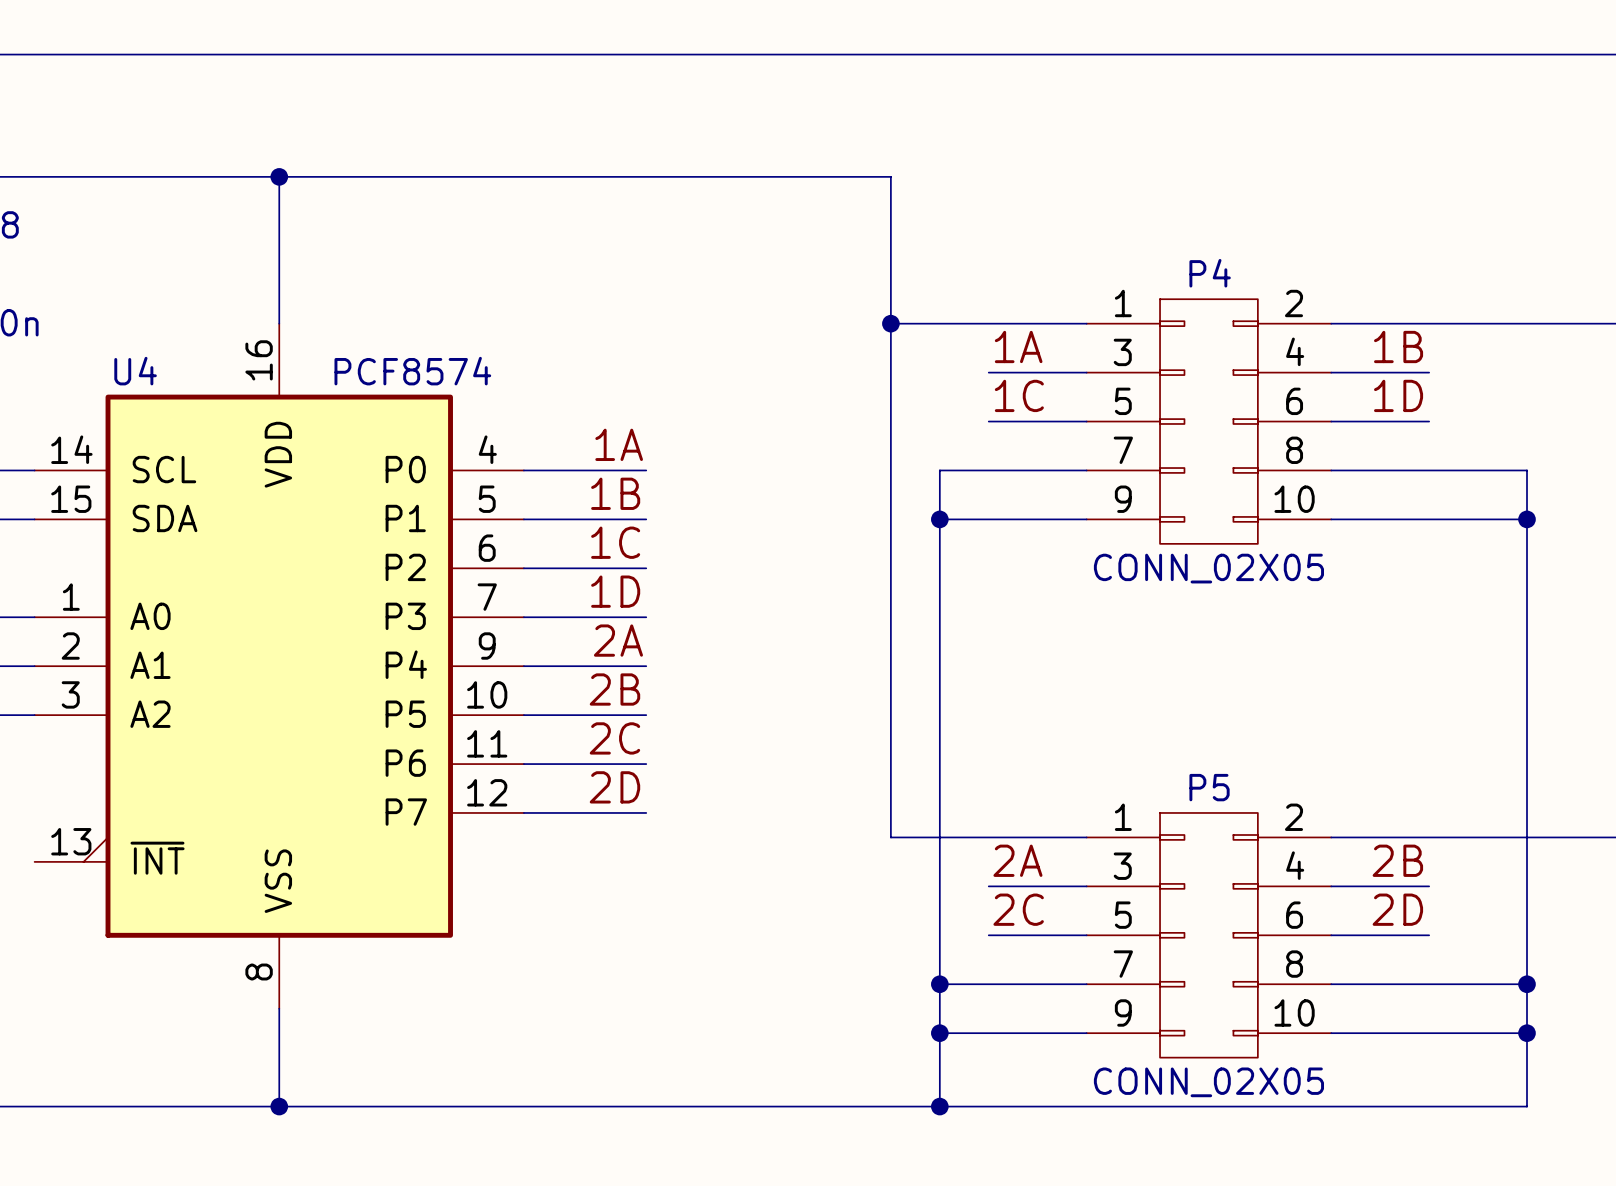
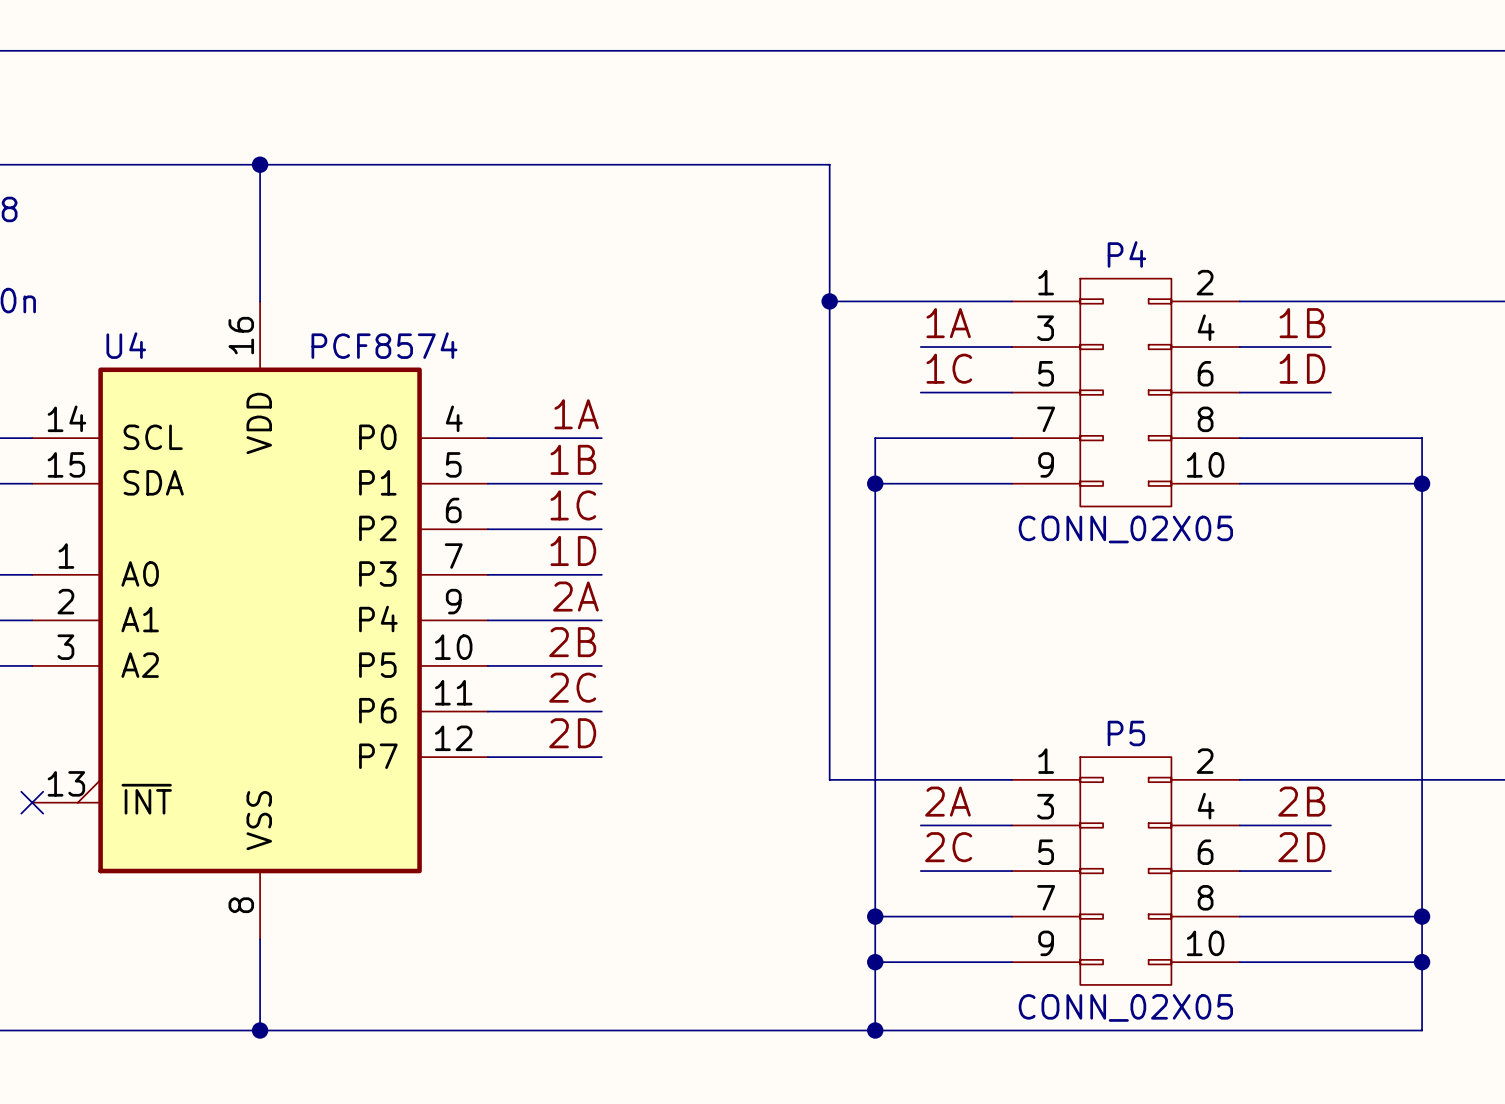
no-connect mark: none -> (32, 802)

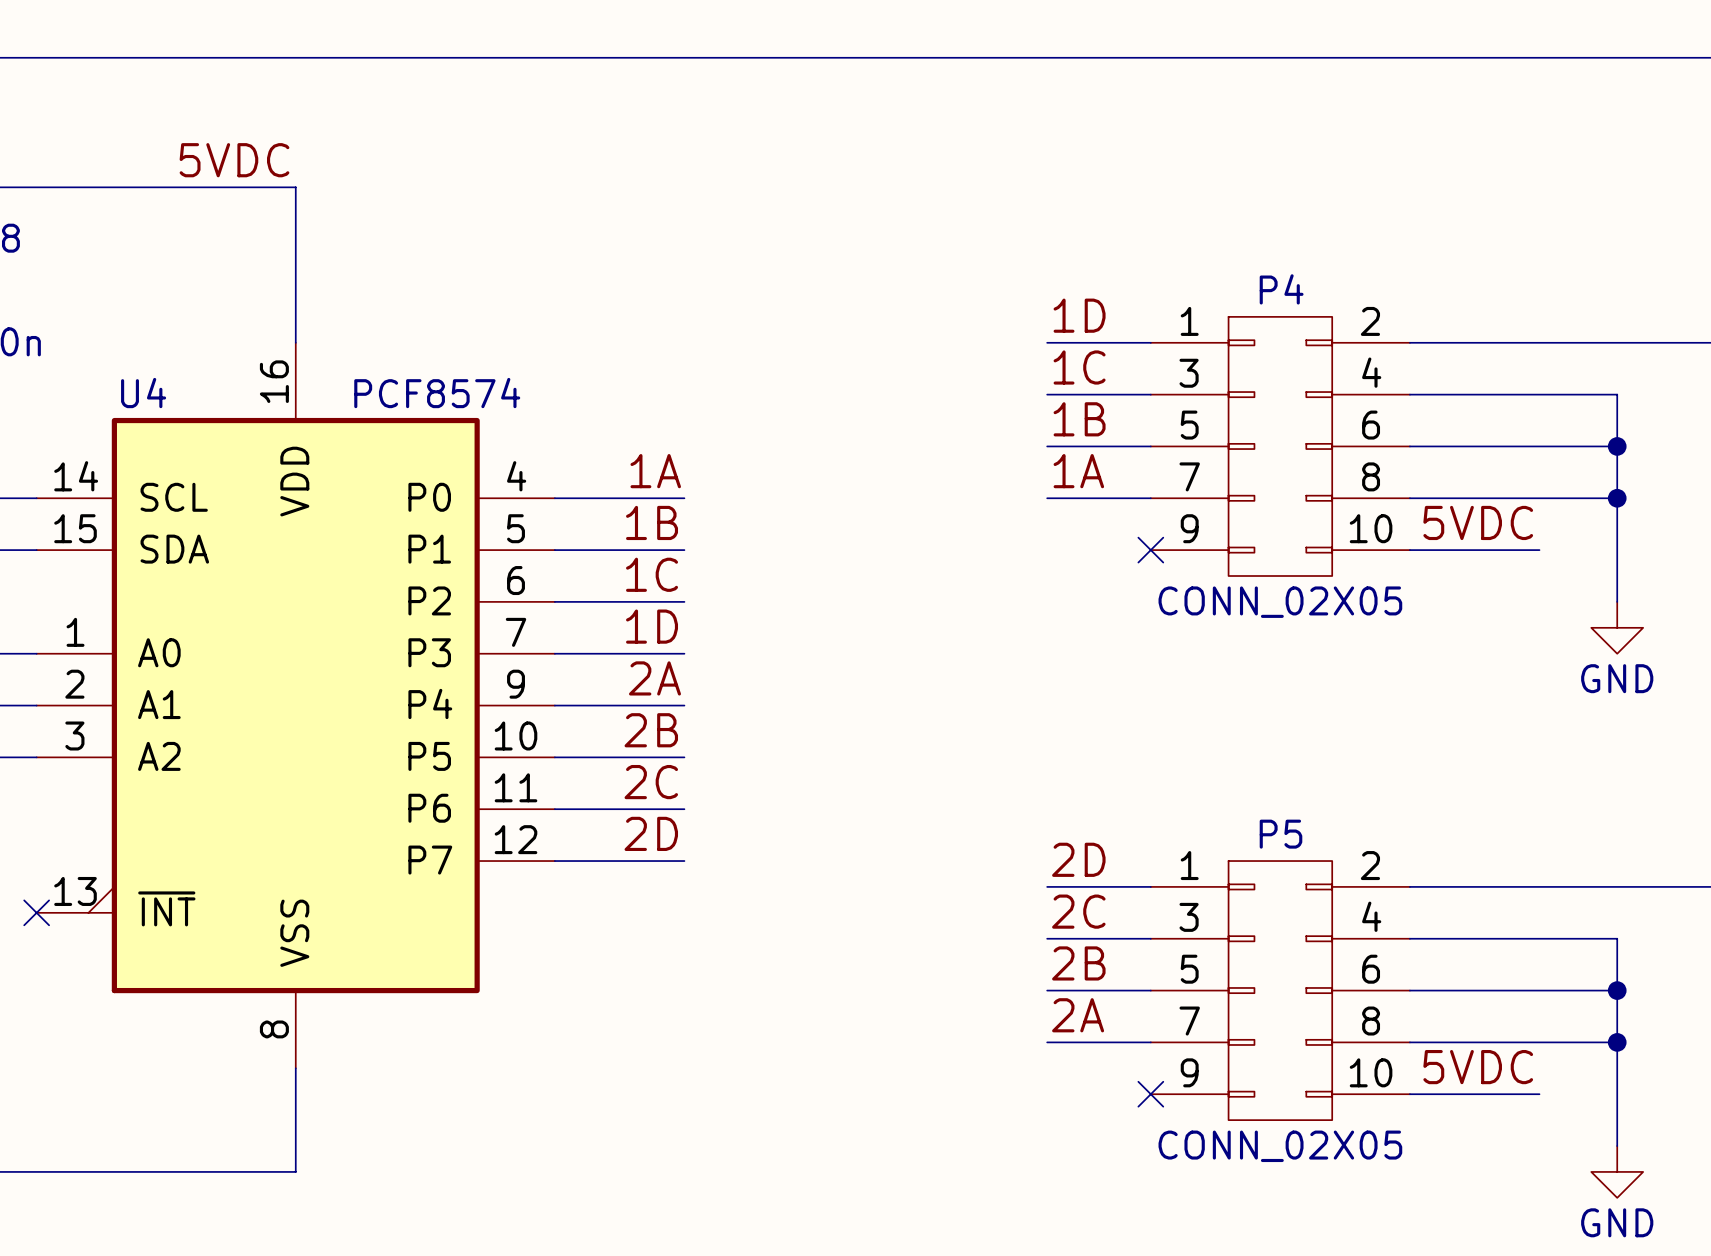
label: none -> 5VDC (234, 160)
wire: (260, 164) (829, 164) (829, 779) (920, 779) -> none
junction: (260, 164) -> none
wire: (829, 301) (920, 301) -> none
junction: (829, 301) -> none
label: 1A (948, 323) -> 1C (1079, 367)
label: 1B (1302, 323) -> none
wire: none -> (1513, 394) (1617, 394) (1617, 498)
label: 1C (949, 368) -> 1B (1079, 419)
label position: 1D (1302, 368) -> 1D (1079, 315)
wire: none -> (1513, 446) (1617, 446)
junction: none -> (1617, 446)
label: none -> 1A (1078, 471)
wire: (920, 438) (875, 438) (875, 1030) -> none
junction: none -> (1617, 498)
label: none -> 5VDC (1478, 522)
wire: (875, 483) (1011, 483) -> none
junction: (875, 483) -> none
no-connect mark: none -> (1150, 550)
wire: (1353, 483) (1422, 483) -> none
junction: (1422, 483) -> none
wire: (1422, 529) (1422, 825) -> (1513, 938) (1617, 938)
power symbol: none -> GND (1617, 627)
label: 2A (947, 801) -> 2C (1078, 911)
label: 2B (1301, 801) -> none
label: 2C (948, 847) -> 2B (1078, 963)
label position: 2D (1301, 847) -> 2D (1078, 859)
wire: none -> (1513, 990) (1617, 990)
label: none -> 2A (1078, 1015)
wire: (875, 916) (920, 916) -> none
junction: (875, 916) -> none
label: none -> 5VDC (1478, 1067)
wire: (875, 962) (1011, 962) -> none
junction: (875, 962) -> none
no-connect mark: none -> (1150, 1094)
wire: (1353, 962) (1422, 962) -> none
junction position: (1422, 962) -> (1617, 990)
wire: (1422, 1007) (1422, 1030) (260, 1030) -> none
junction: (260, 1030) -> none
junction: (875, 1030) -> none
power symbol: none -> GND (1617, 1171)

